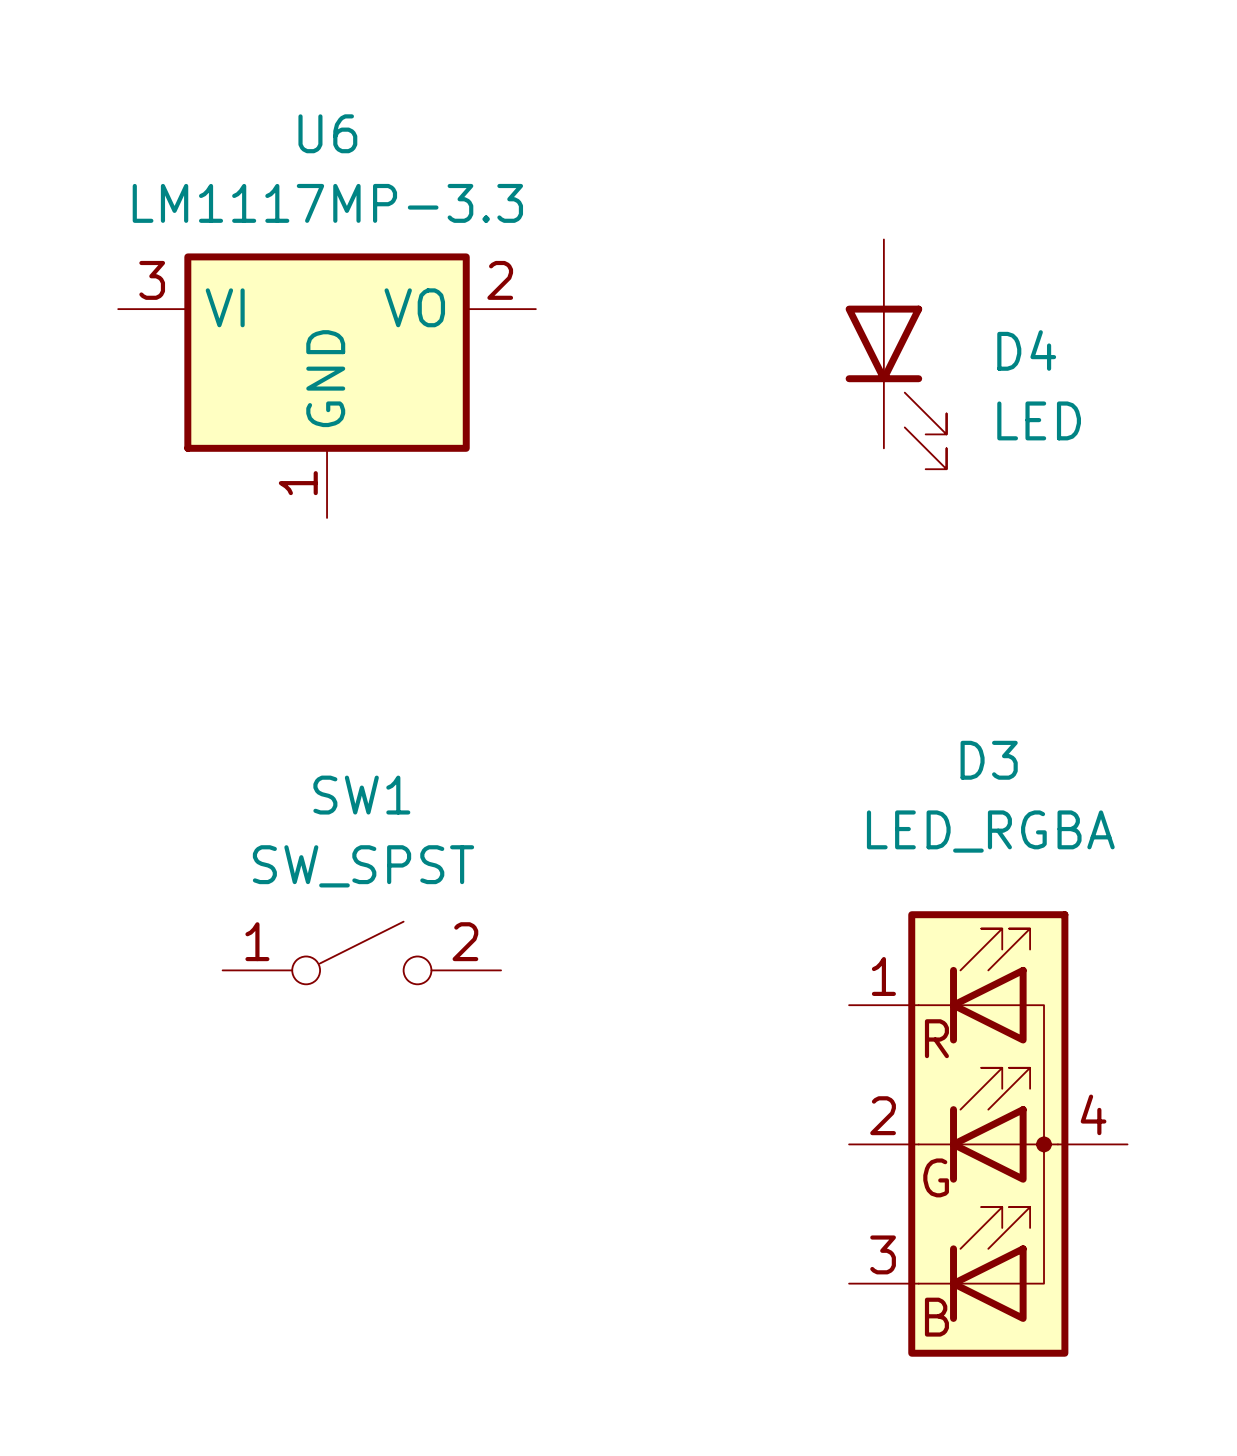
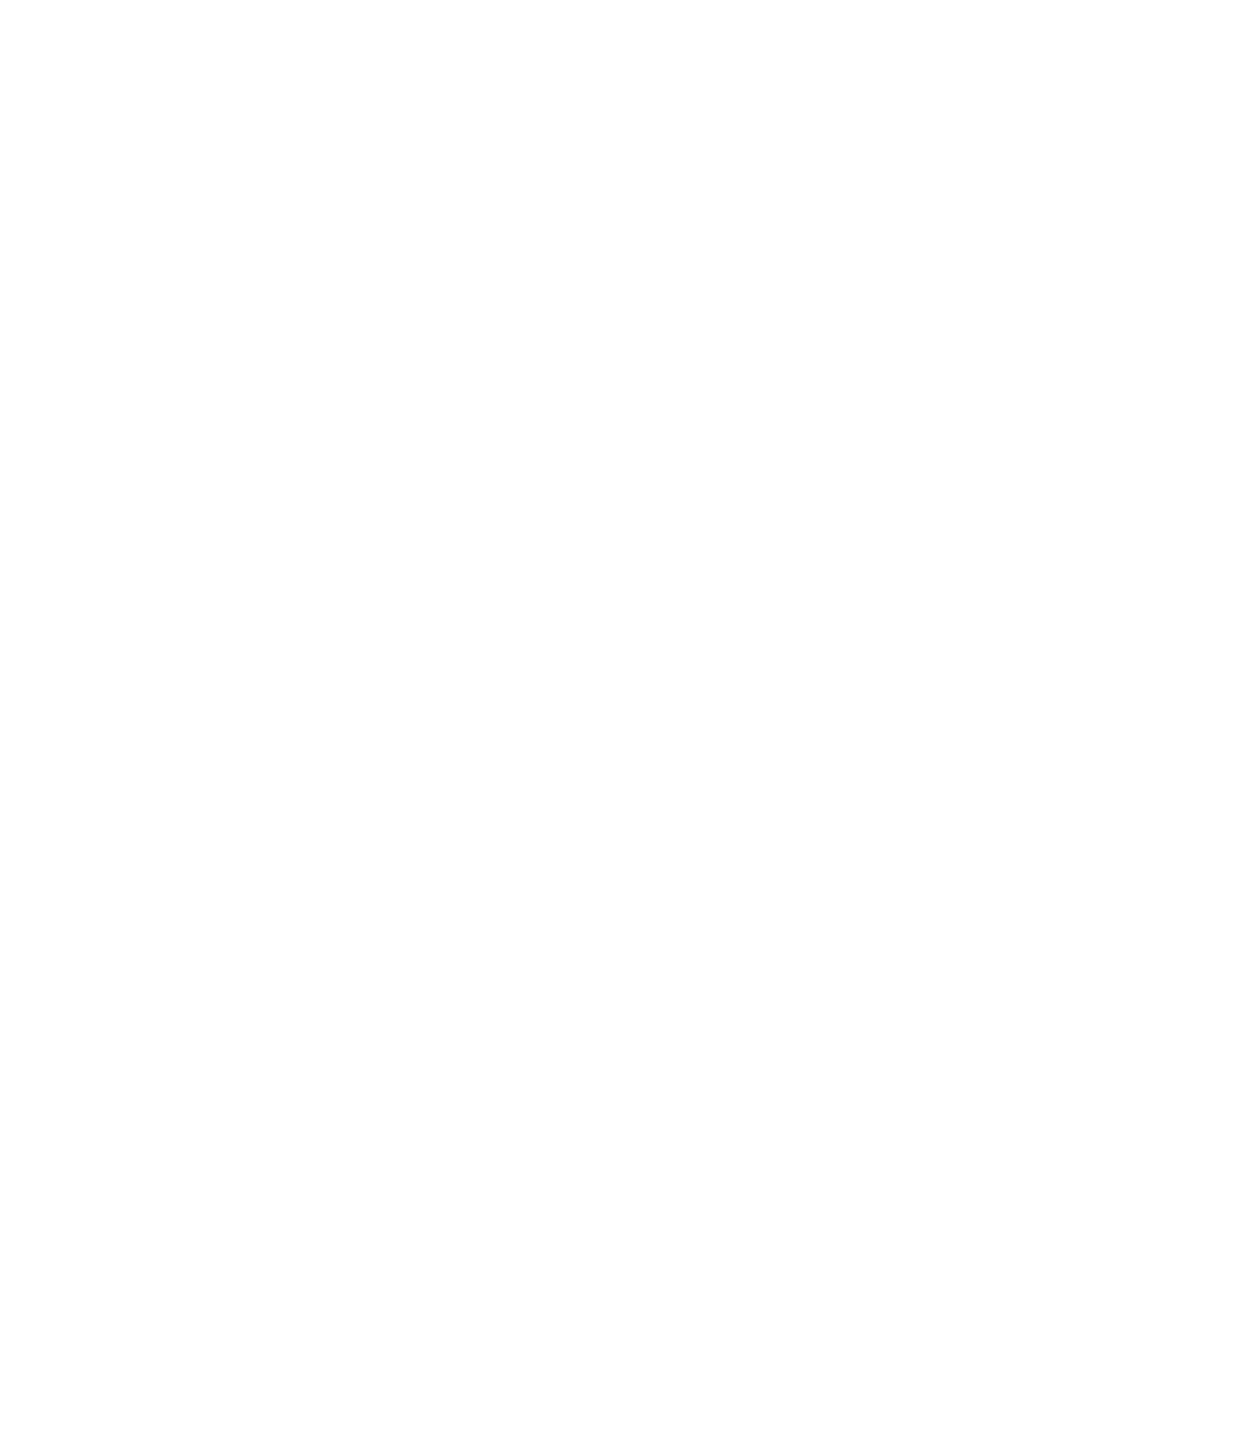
D4: LED (896, 354) -> none
U6: LM1117MP-3.3 (327, 385) -> none
SW1: SW_SPST (361, 952) -> none
D3: LED_RGBA (988, 1133) -> none

